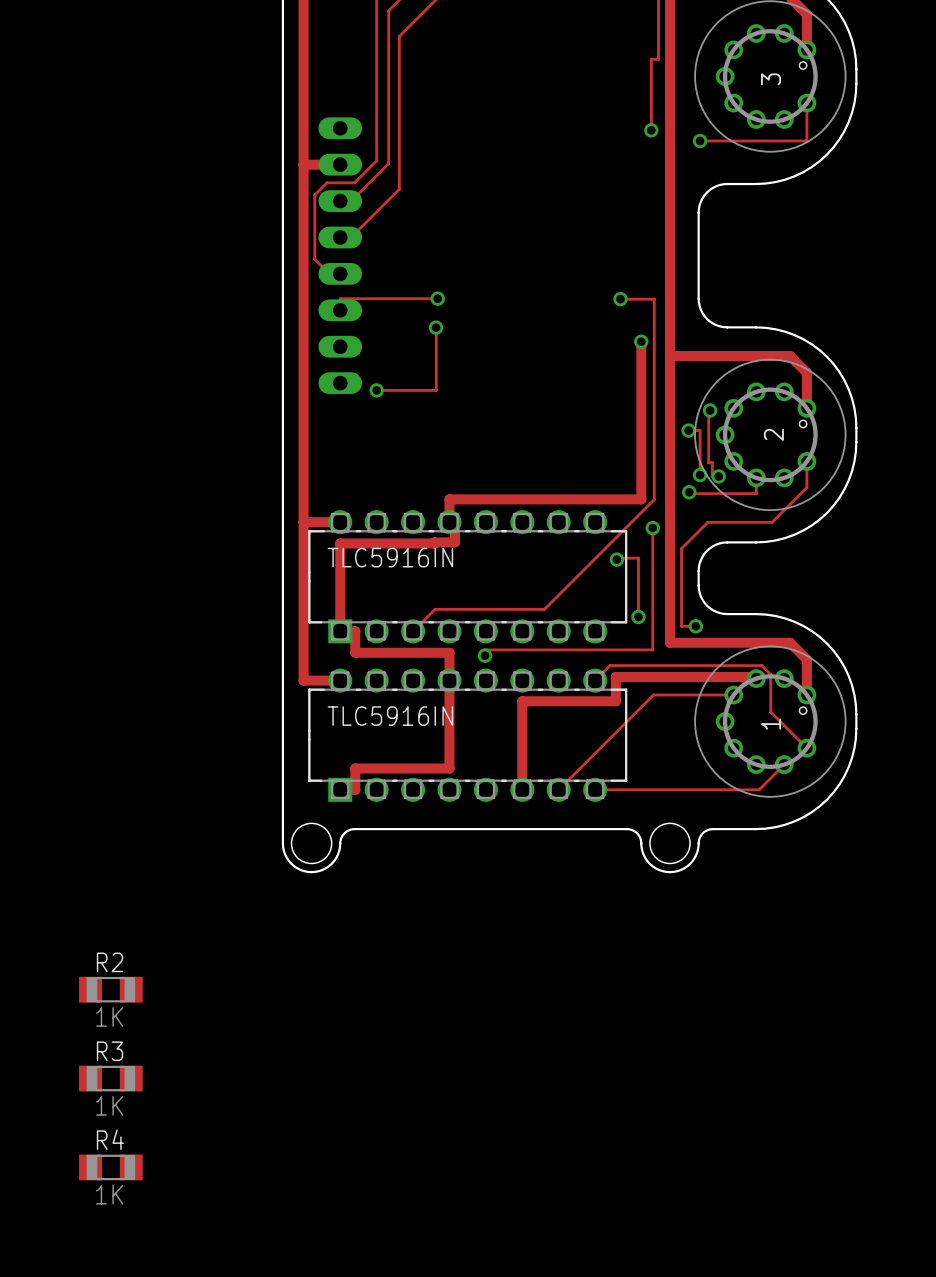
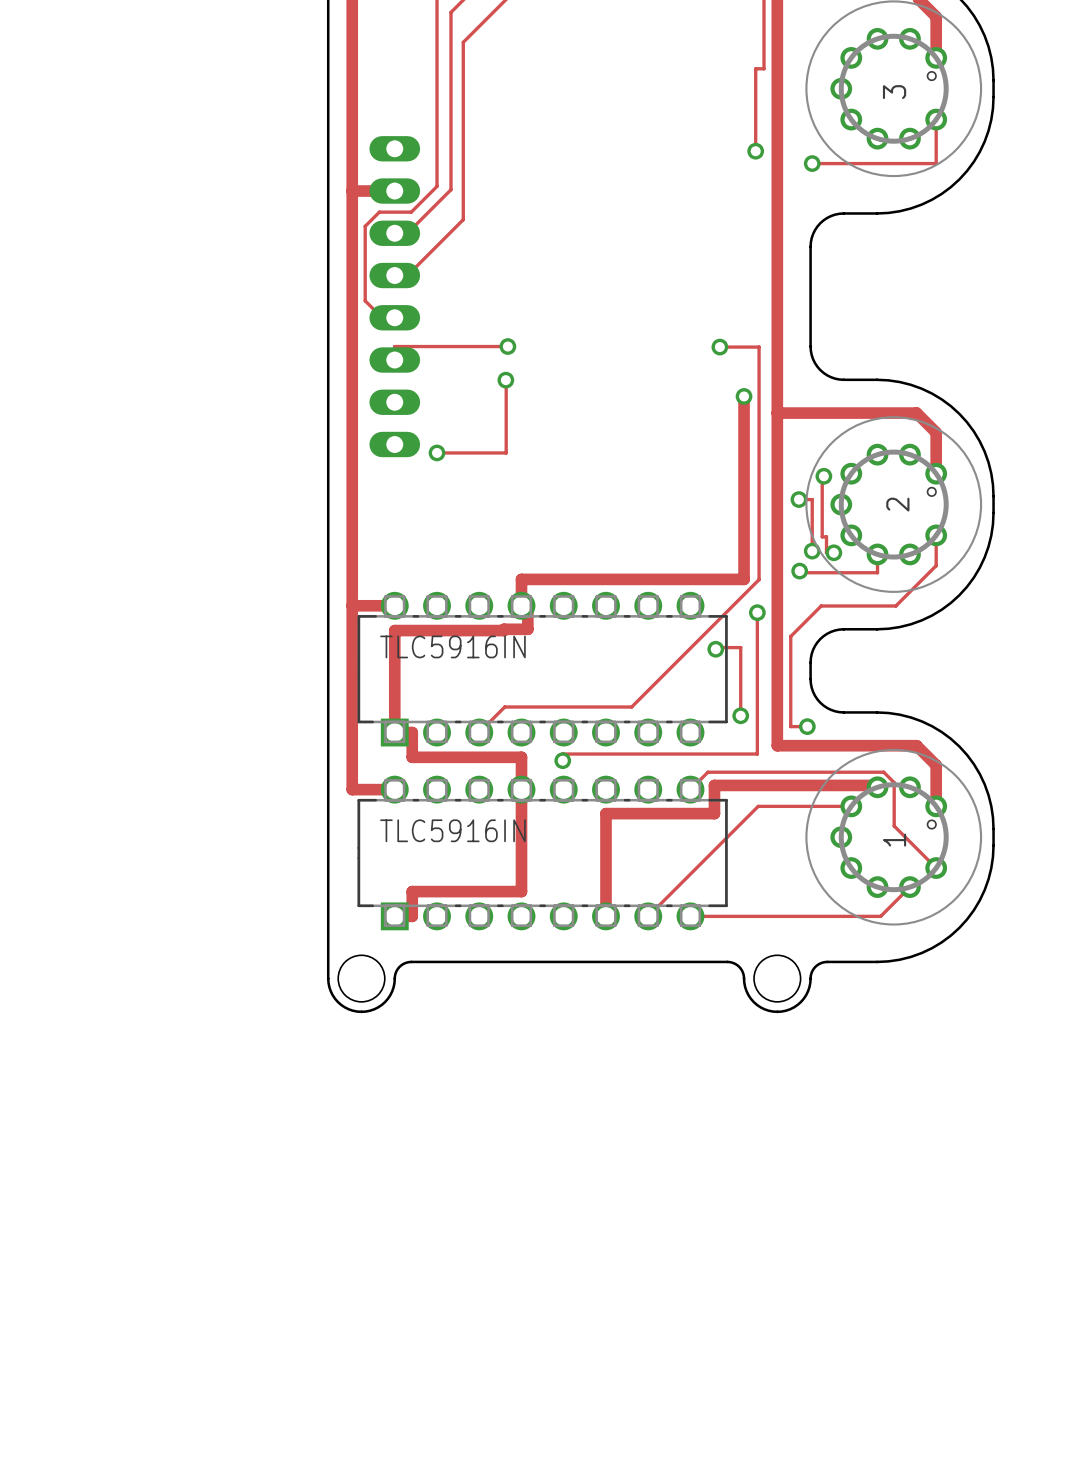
R2: 1K (110, 989) -> none
R3: 1K (110, 1078) -> none
R4: 1K (110, 1167) -> none

